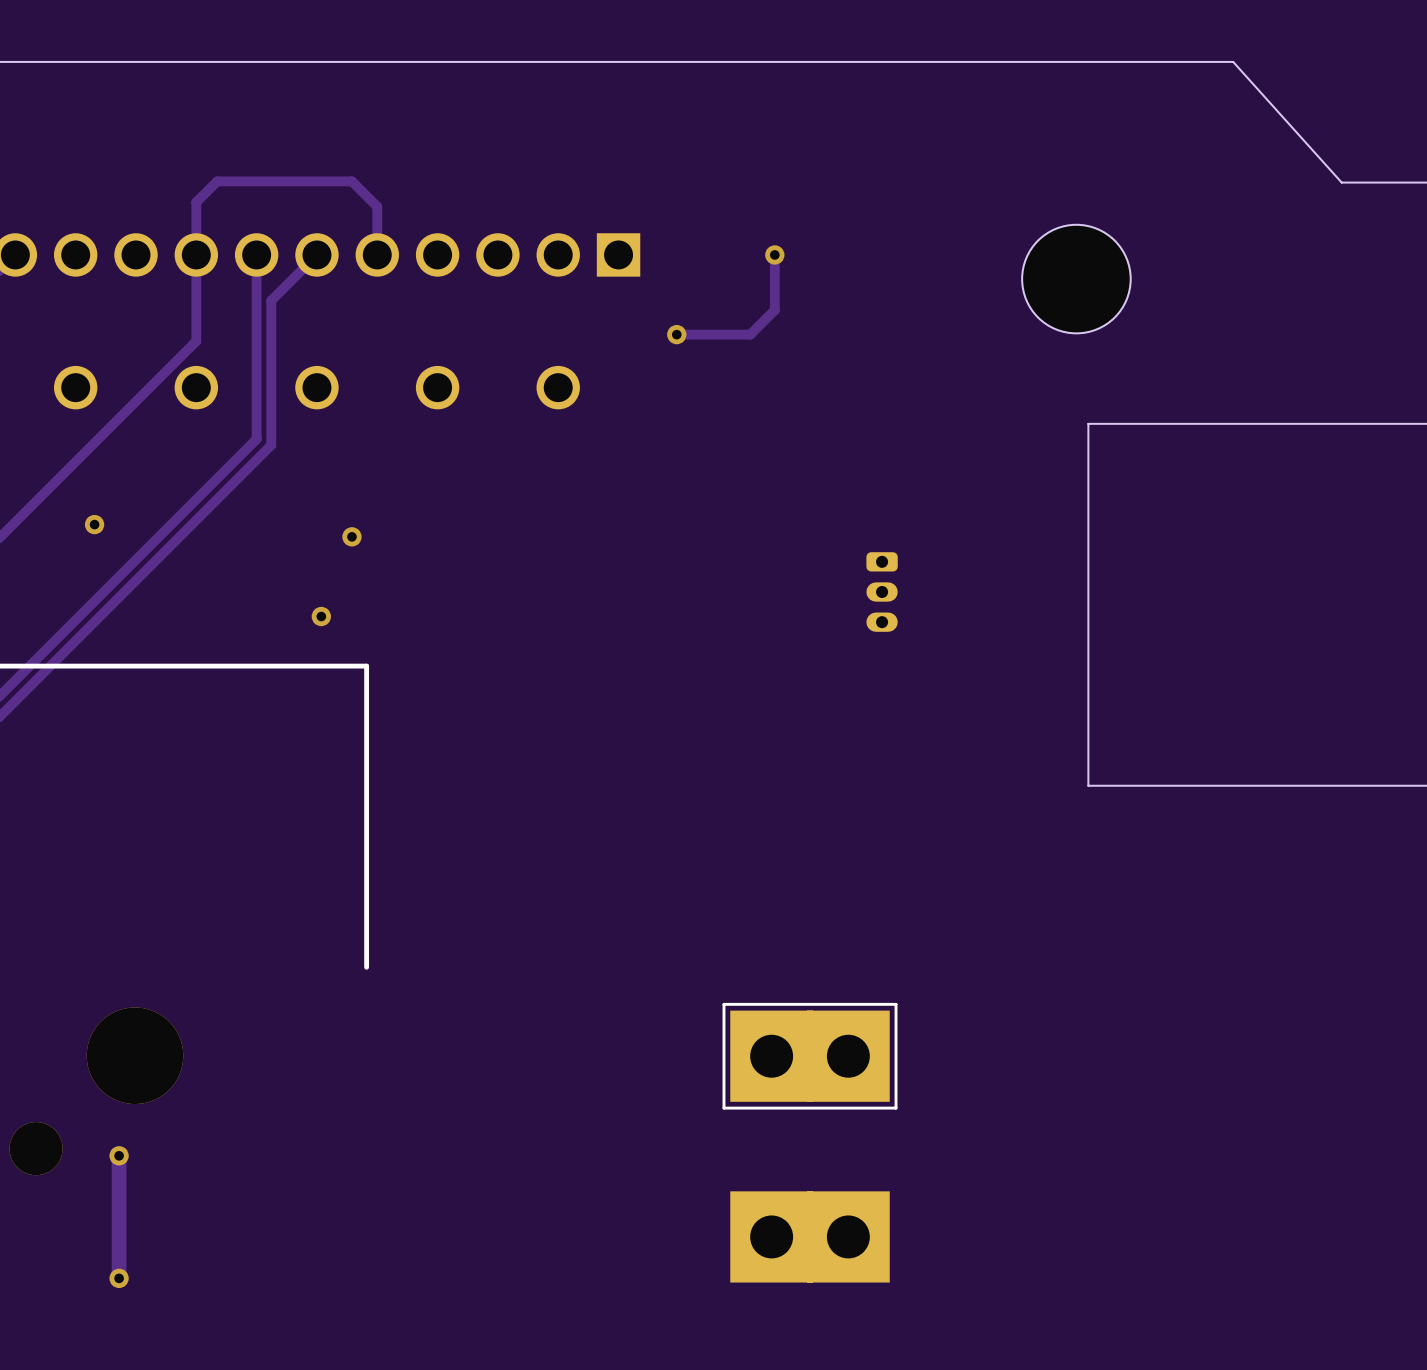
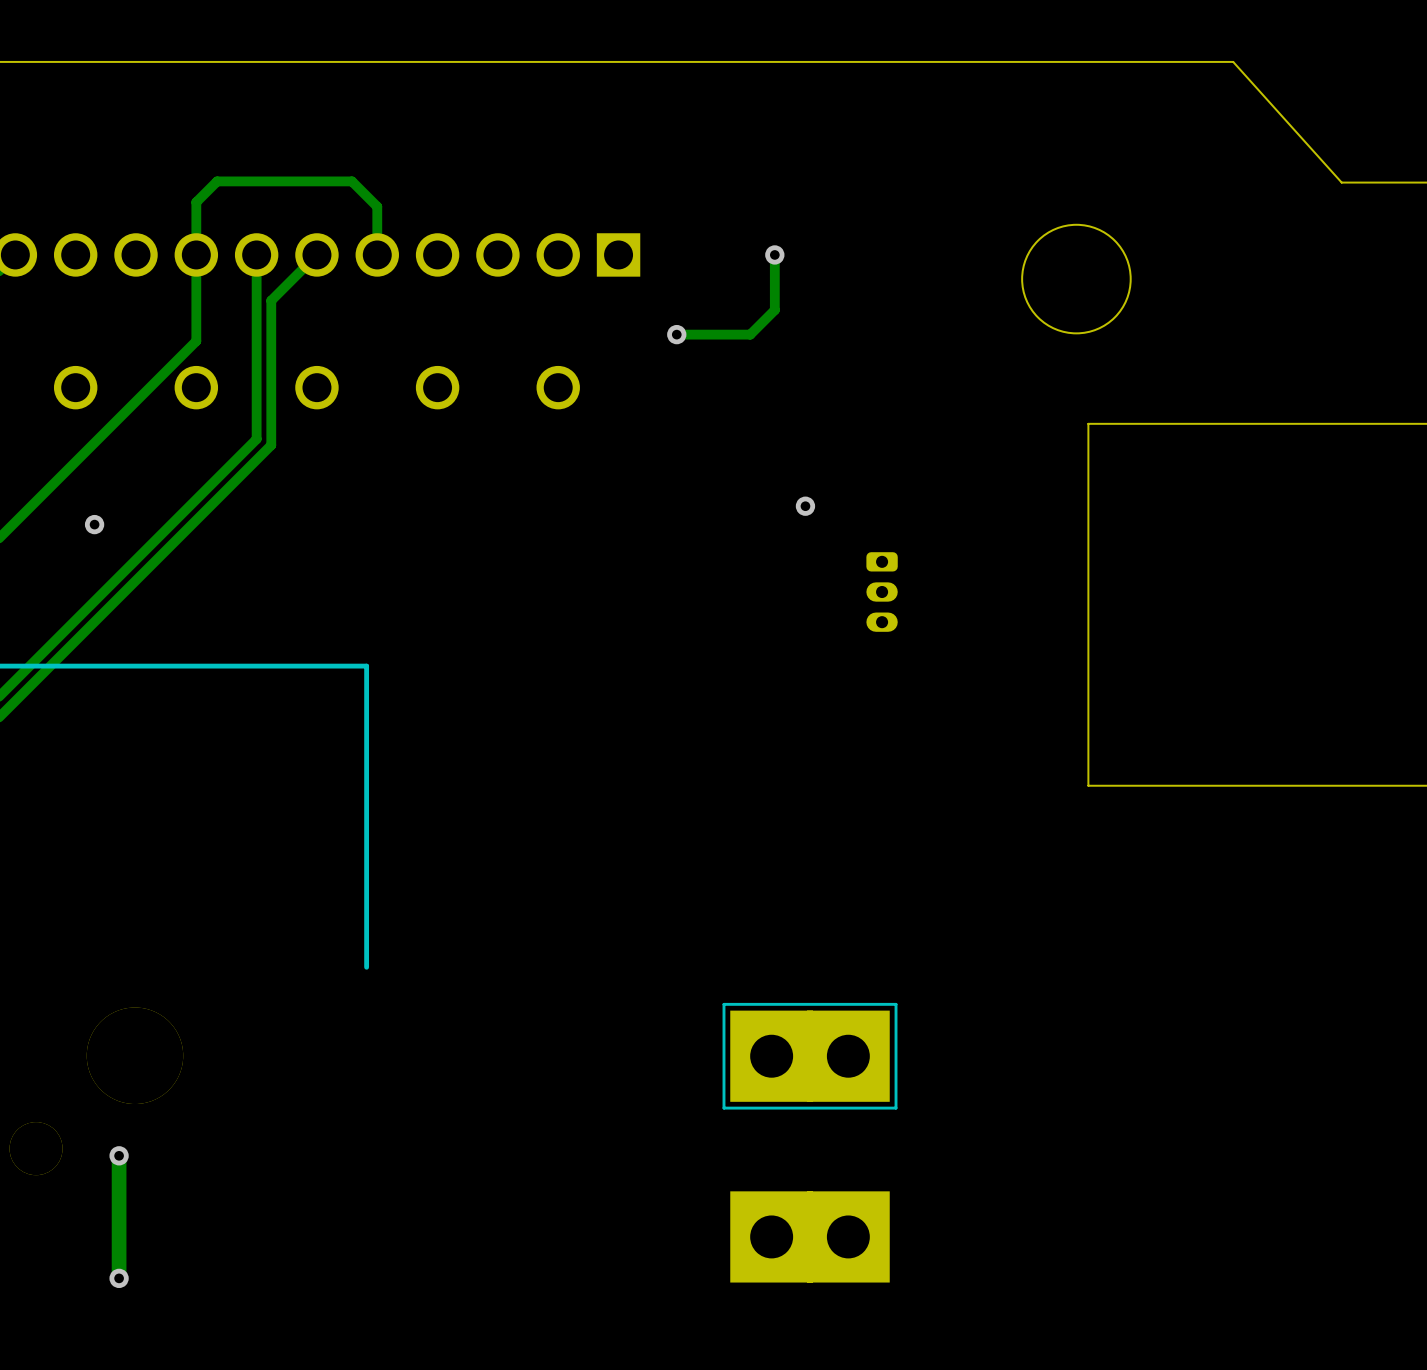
via: none -> (805, 506)
via: (351, 536) -> none
via: (321, 616) -> none

